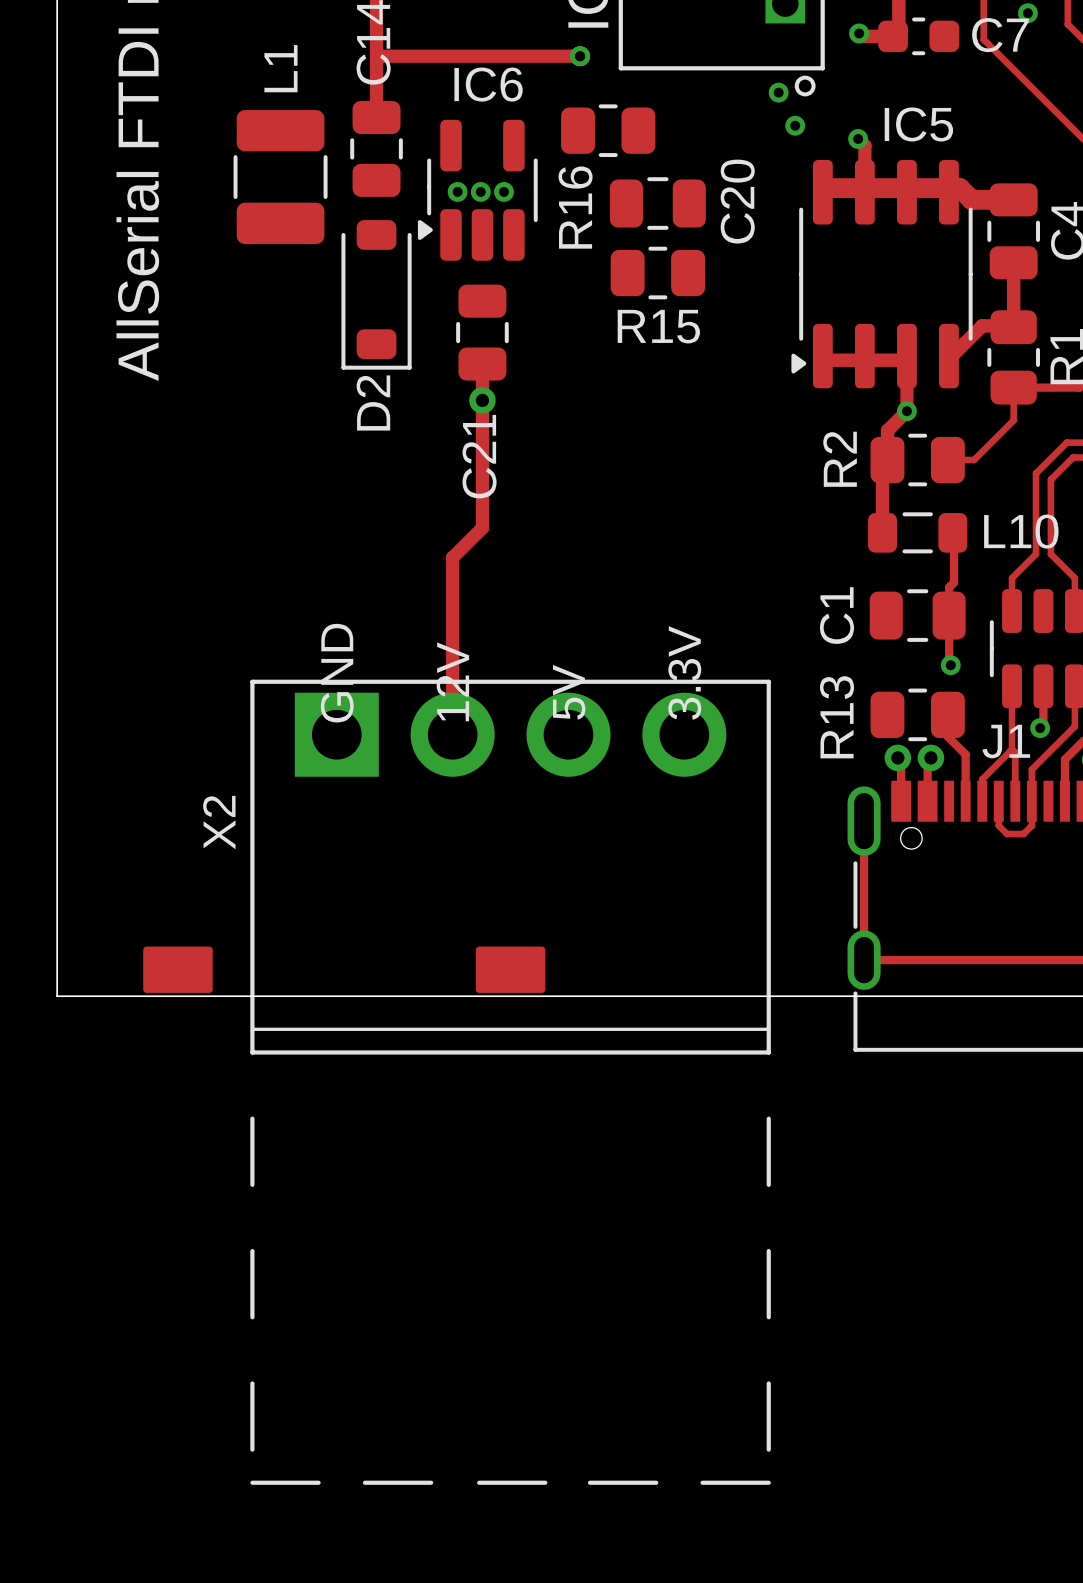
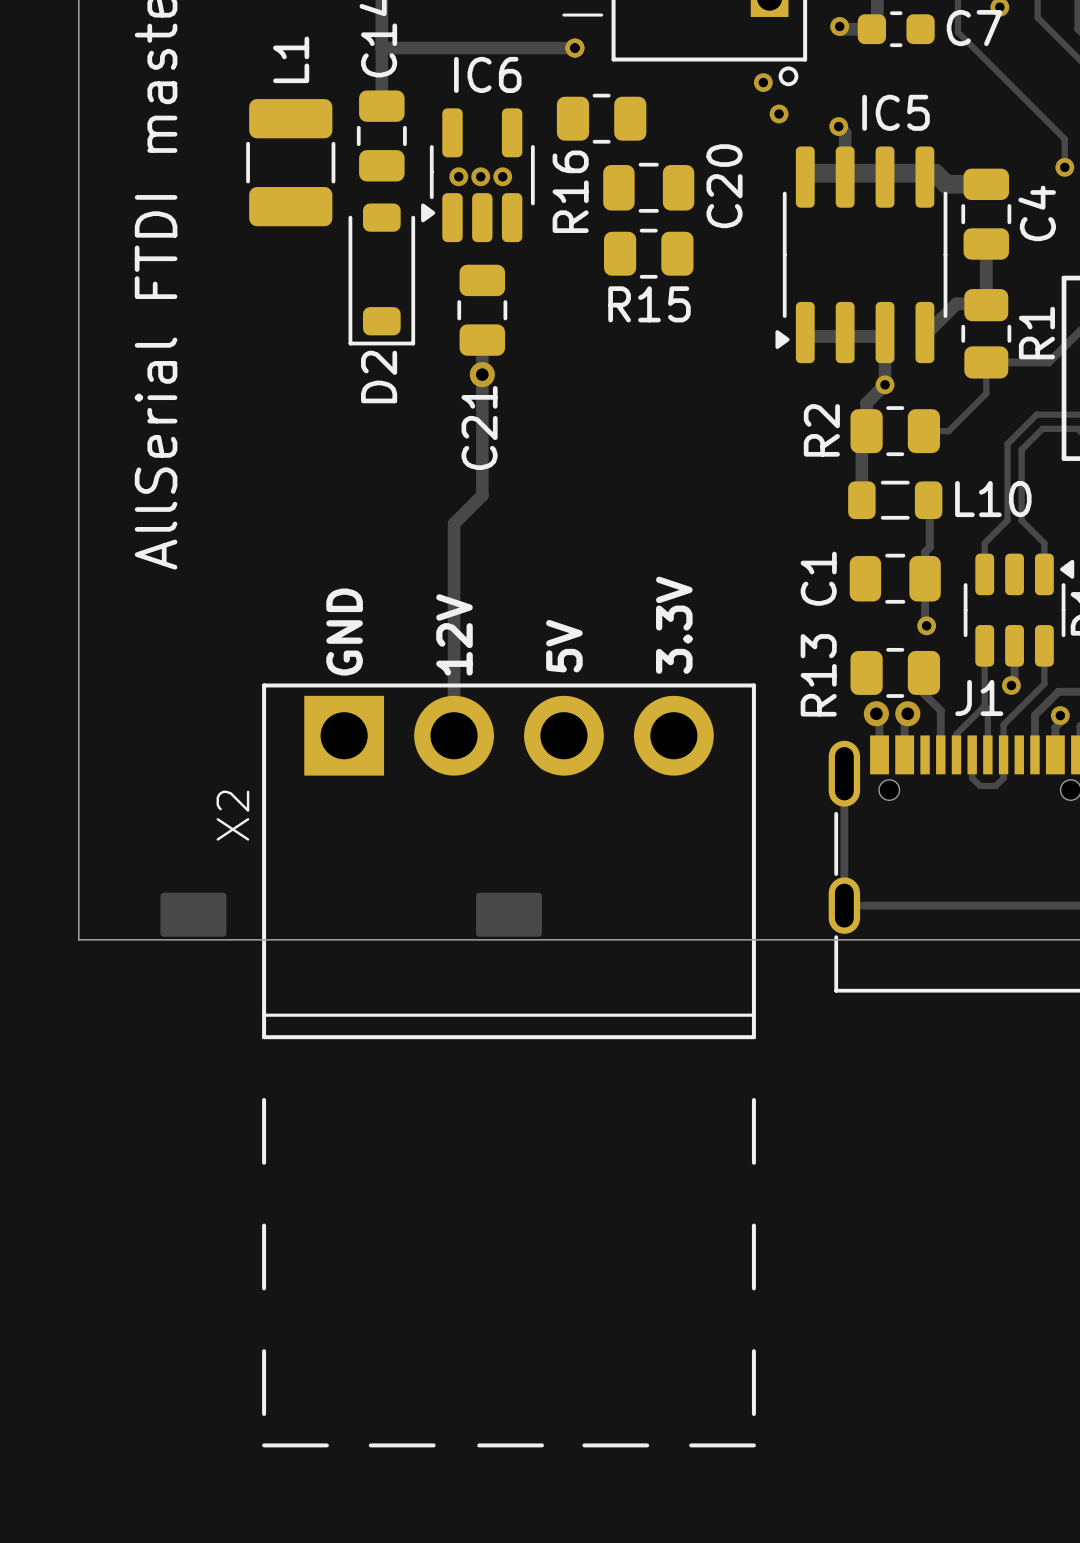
X2 position: (510, 1082) -> (509, 1065)

